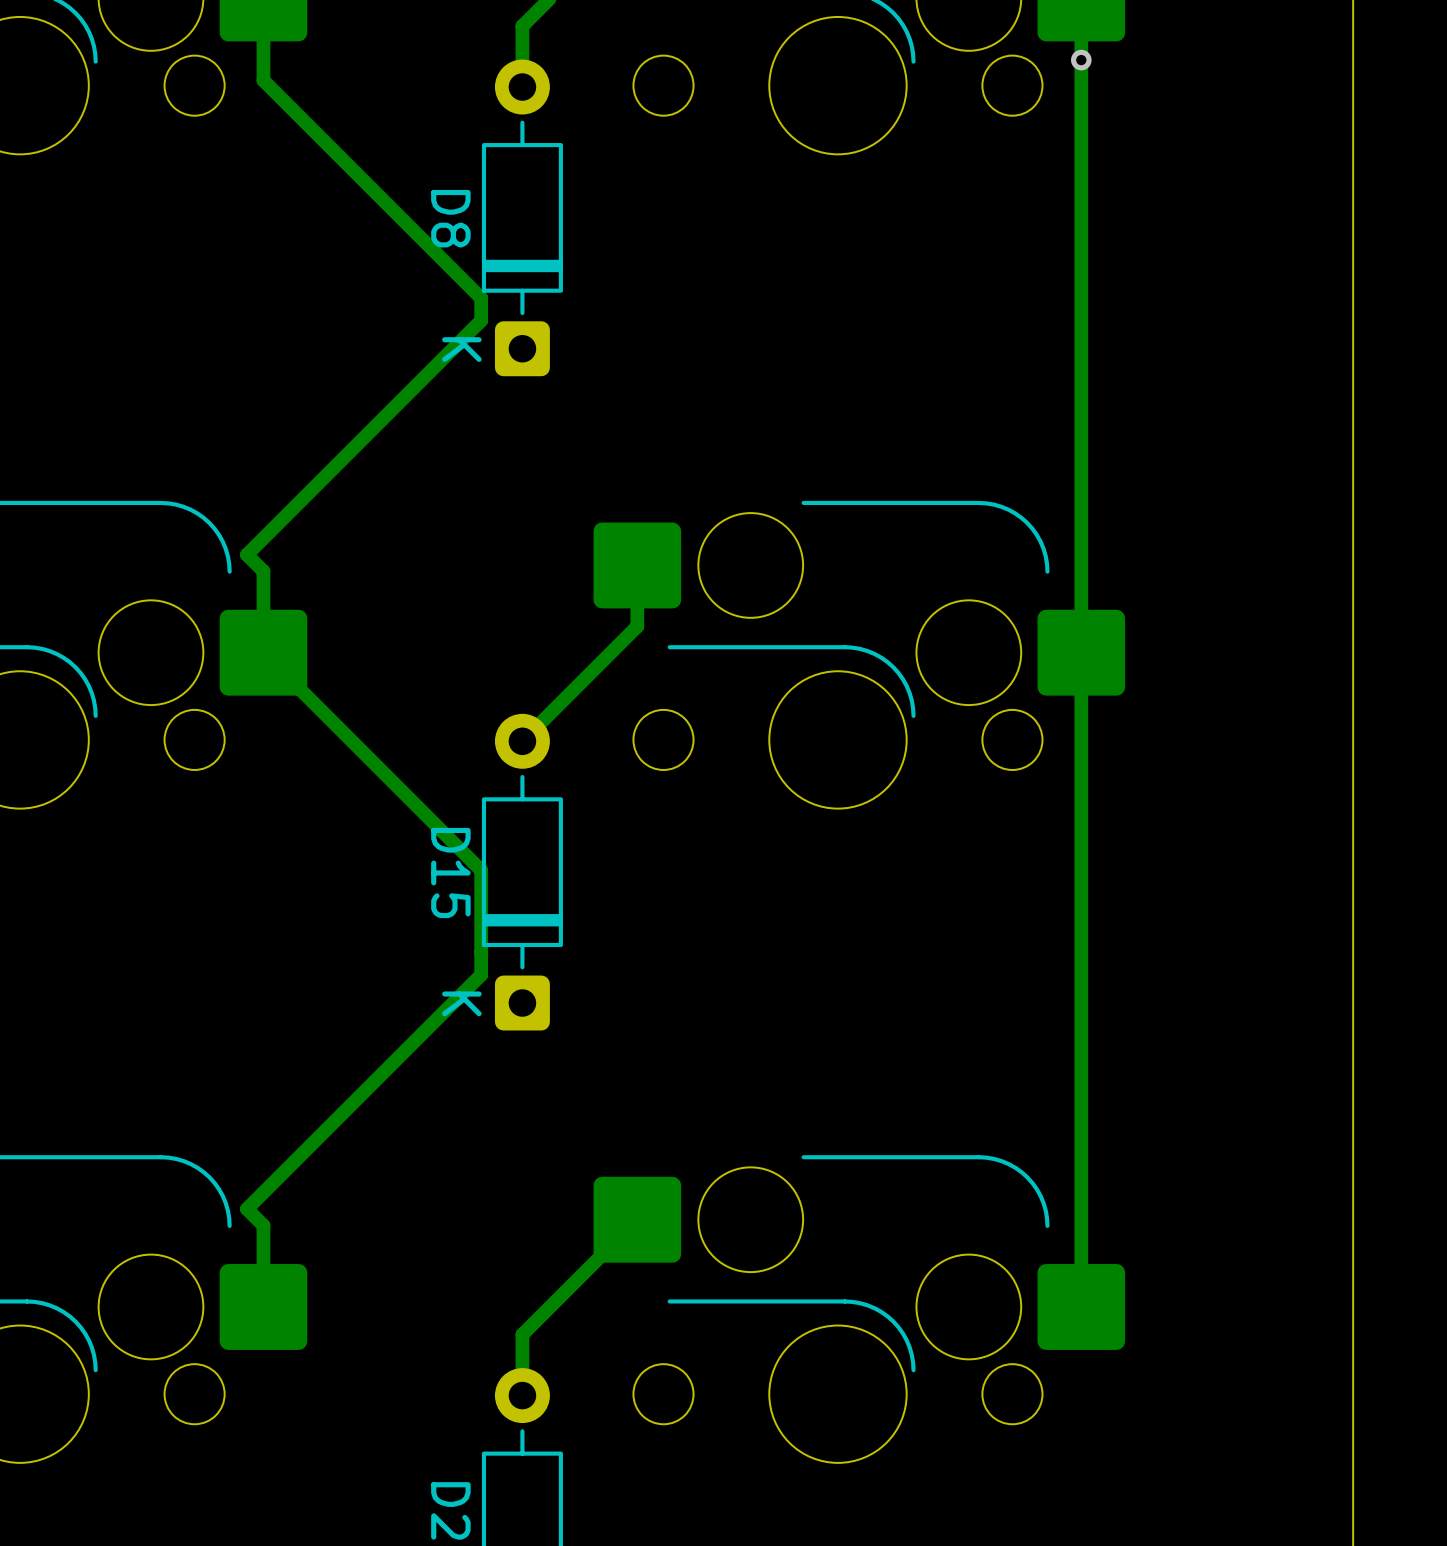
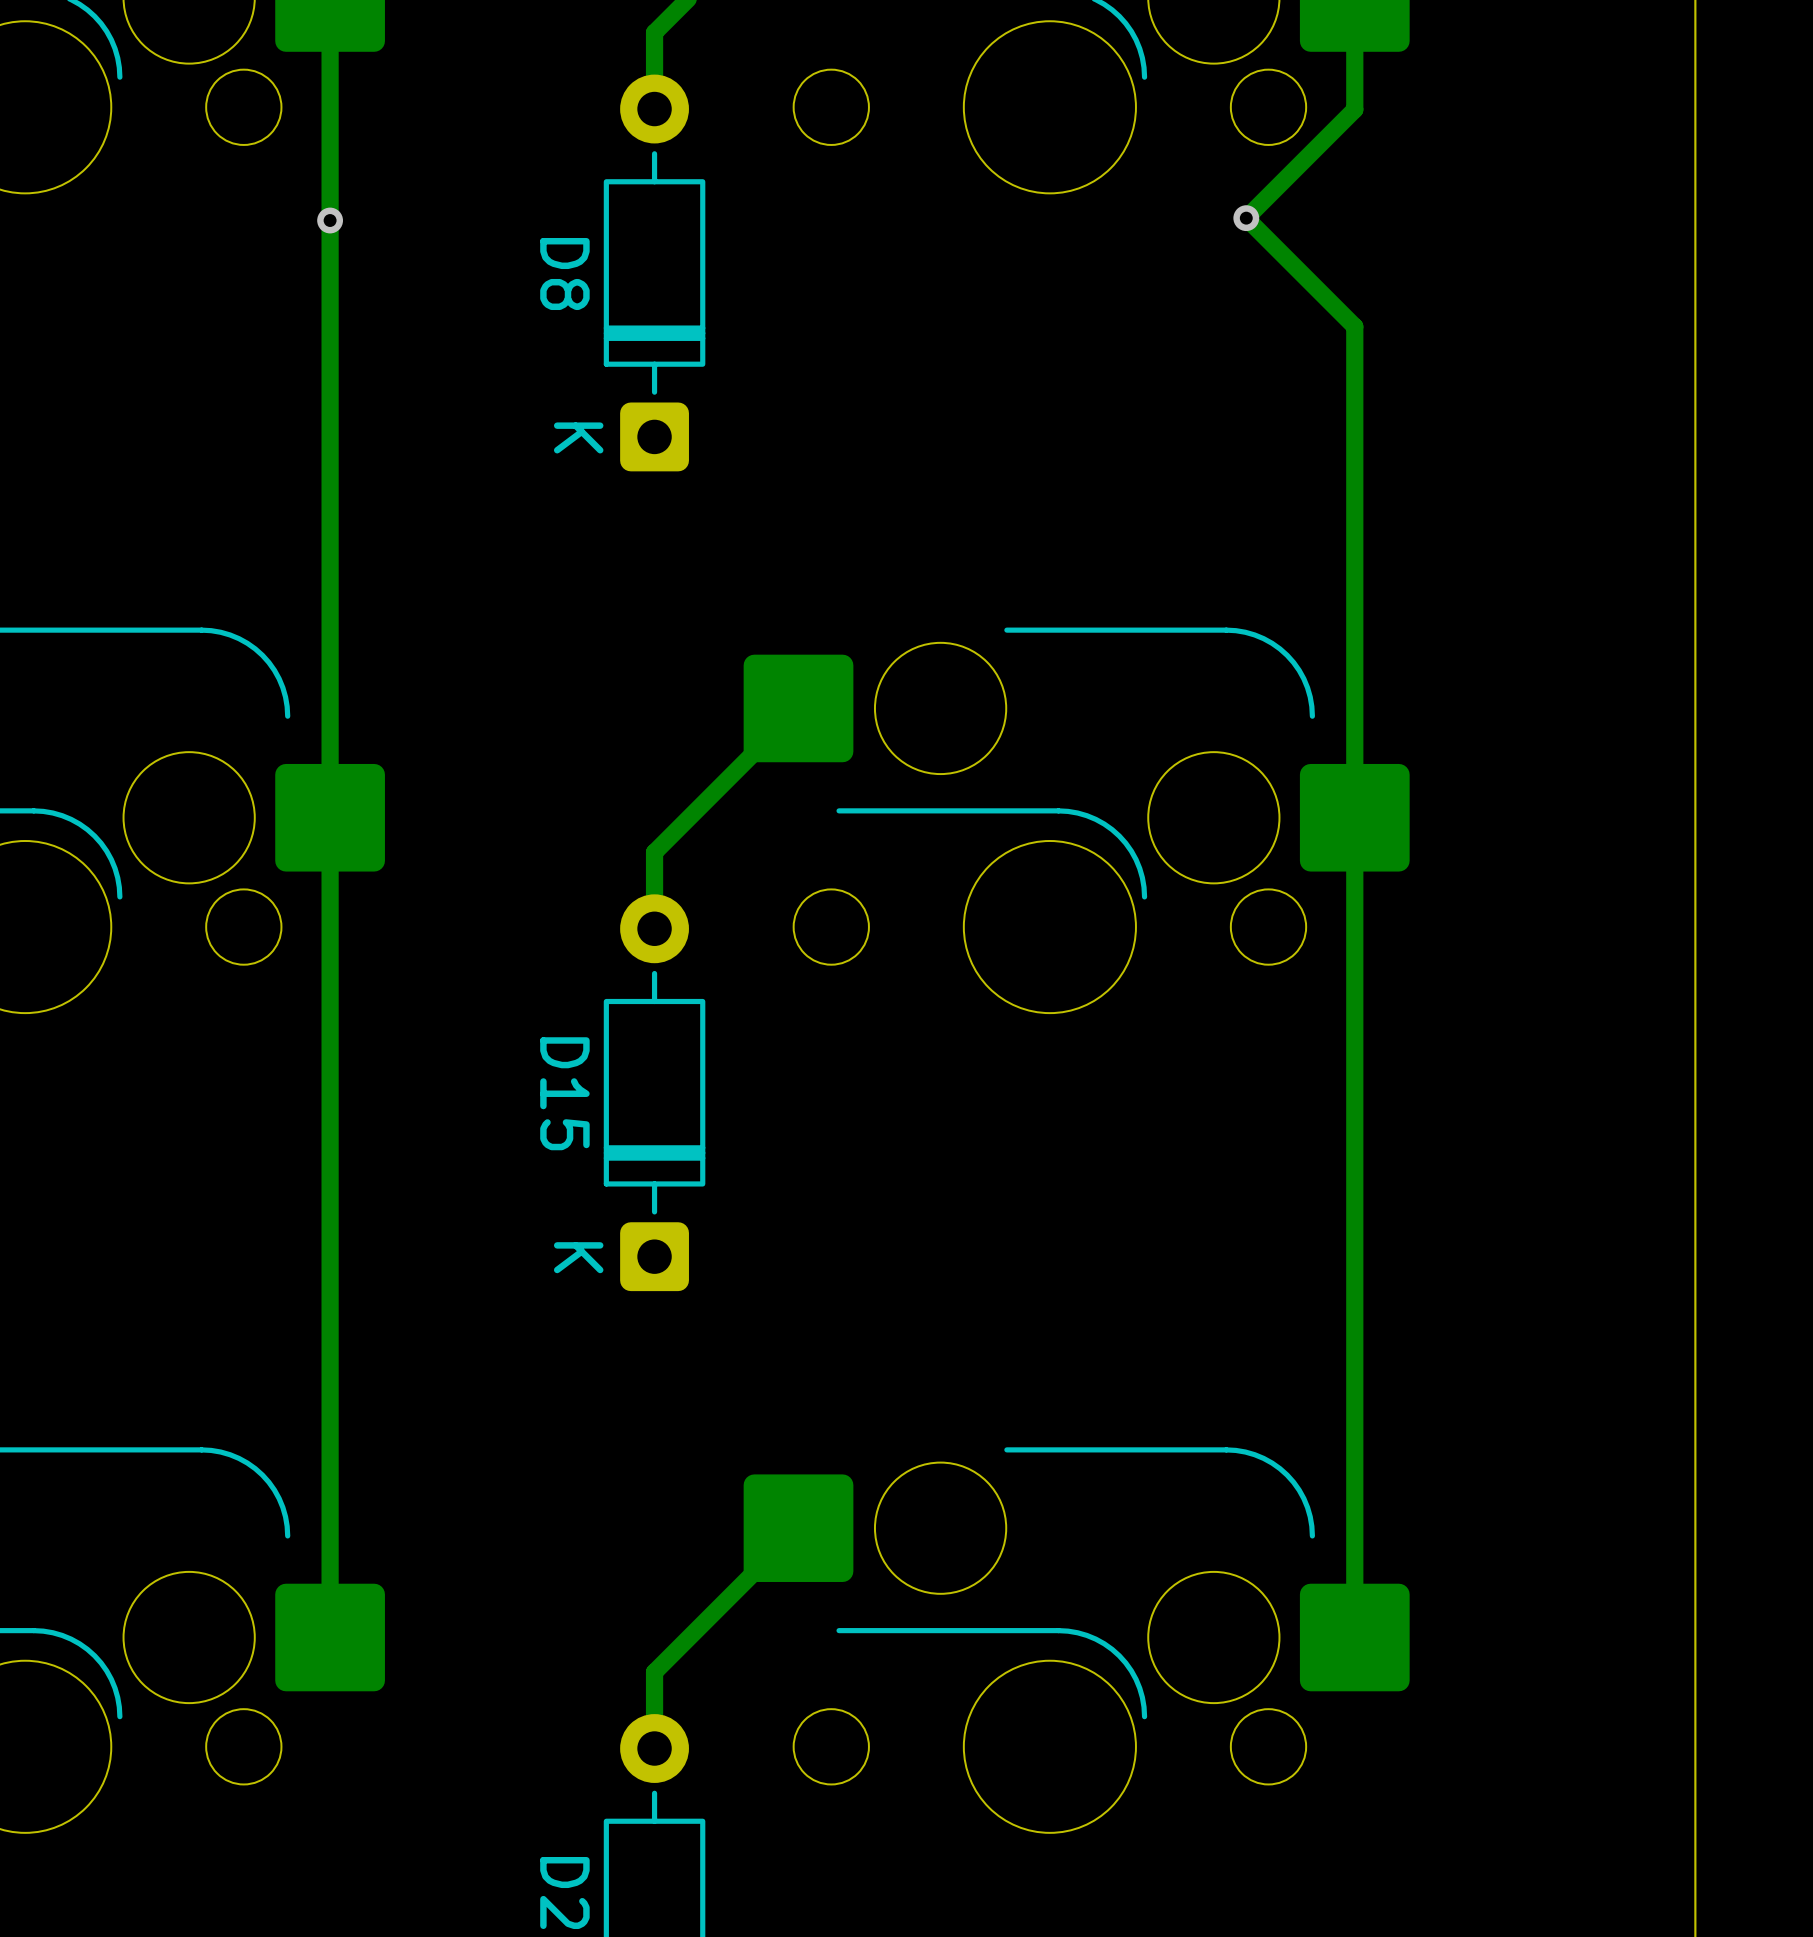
via position: (1081, 60) -> (1246, 218)
track: (263, 80) (481, 298) (481, 320) (246, 554) (263, 571) -> (330, 100) (330, 715)
track: (1081, 87) (1081, 260) -> (1354, 109) (1246, 218) (1354, 326)
via: none -> (330, 220)
track: (637, 565) (637, 626) (522, 741) -> (798, 708) (654, 852) (654, 928)
track: (263, 652) (481, 870) (481, 974) (246, 1209) (263, 1225) -> (330, 817) (330, 1535)

